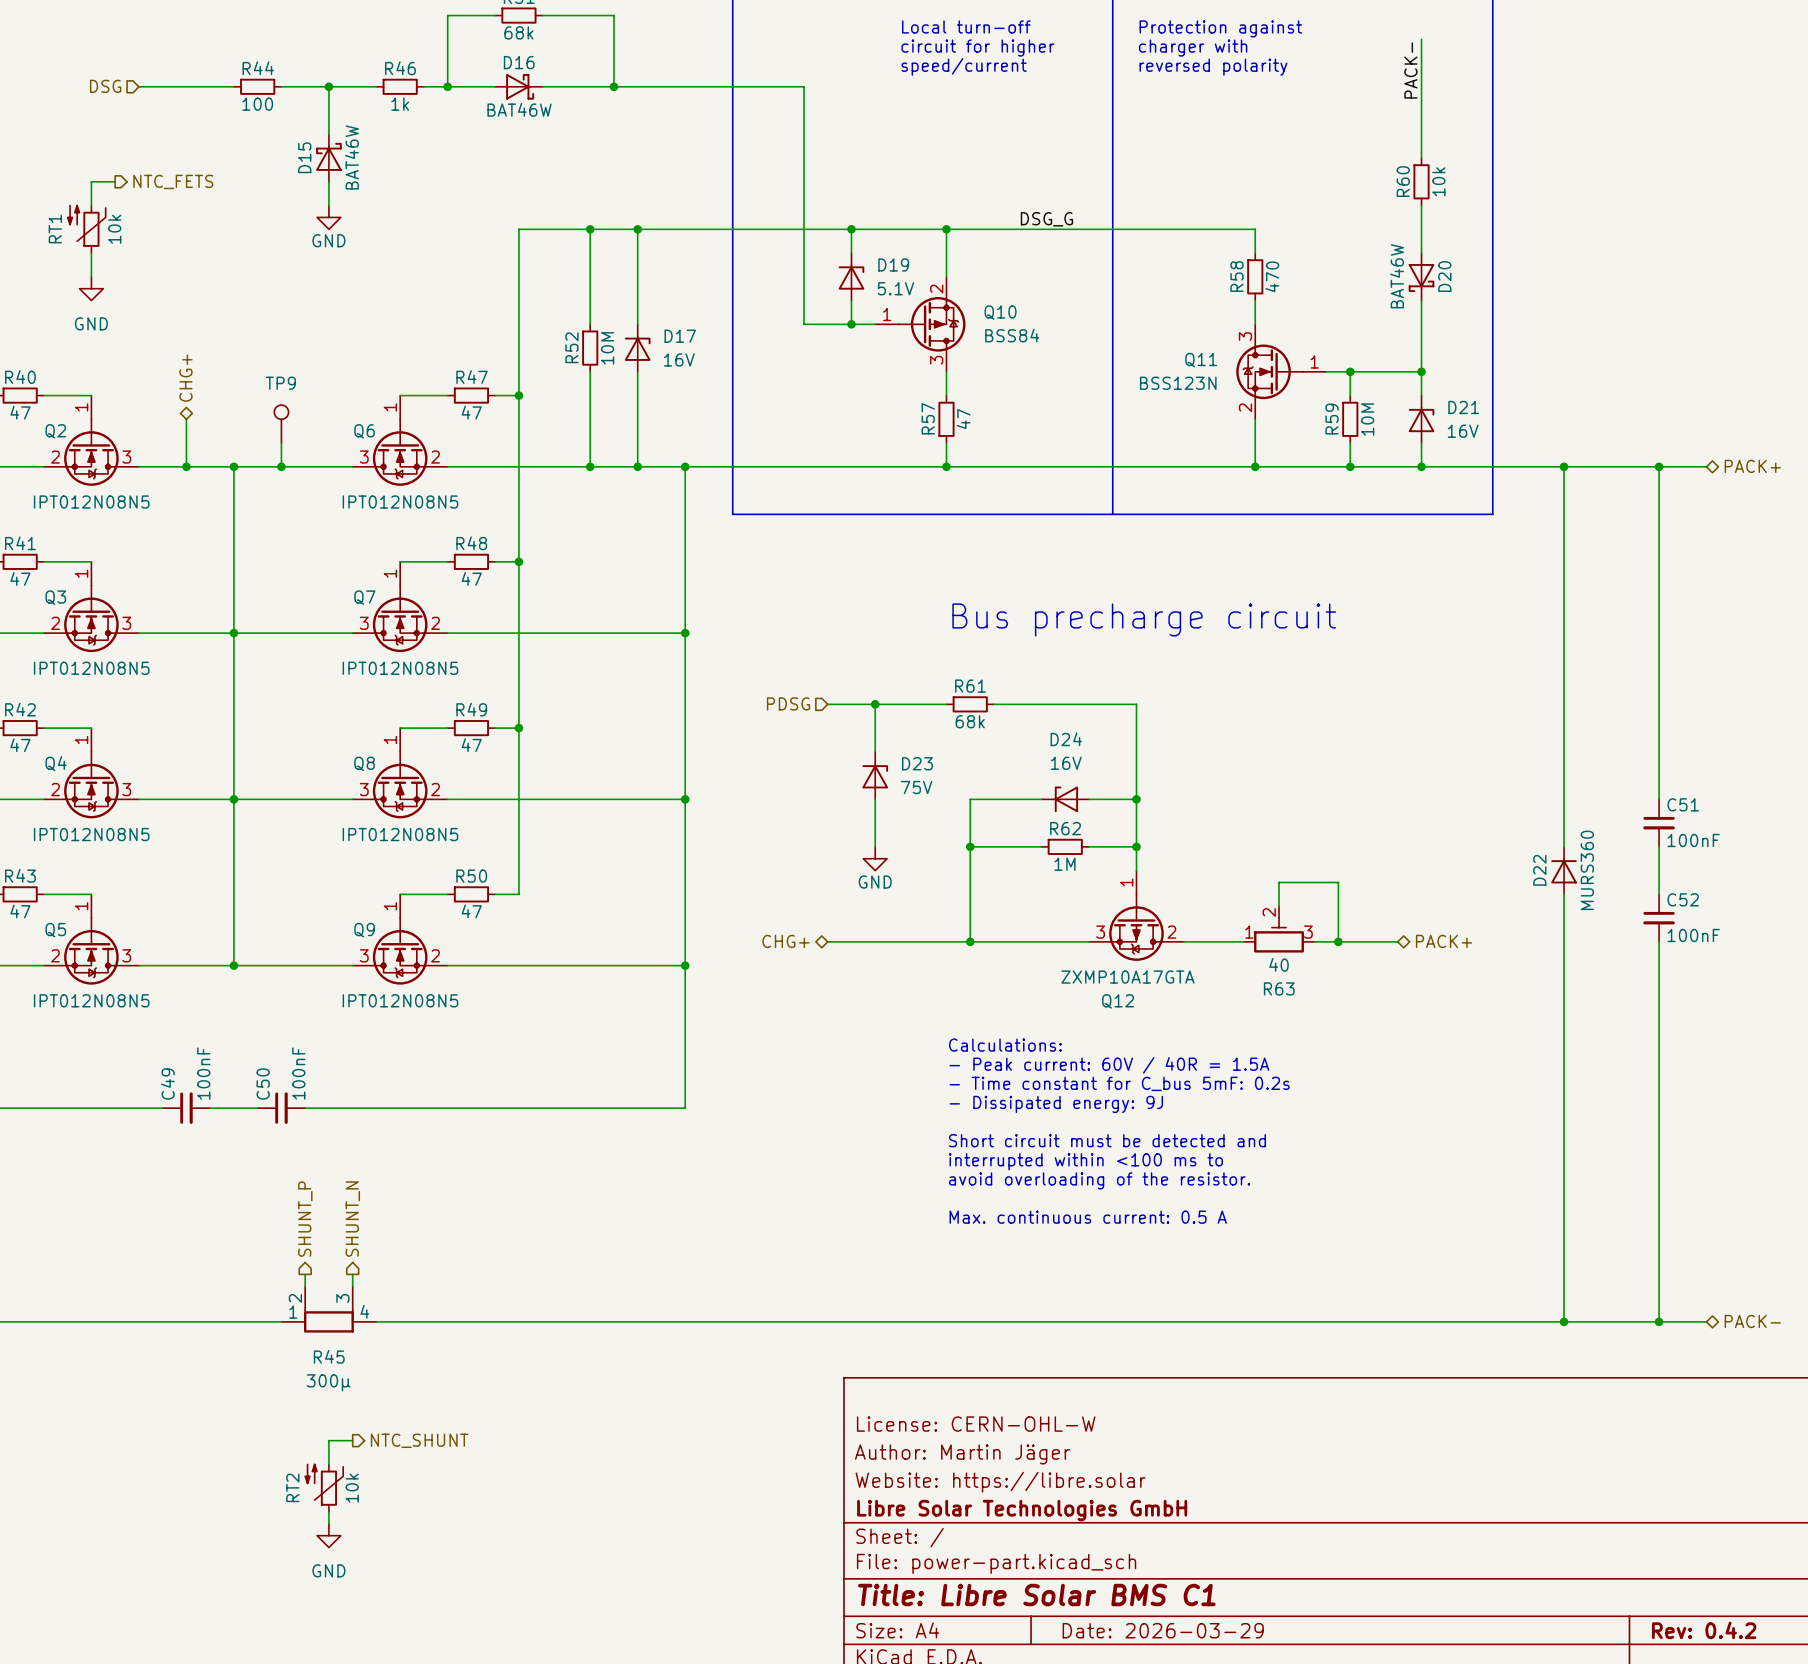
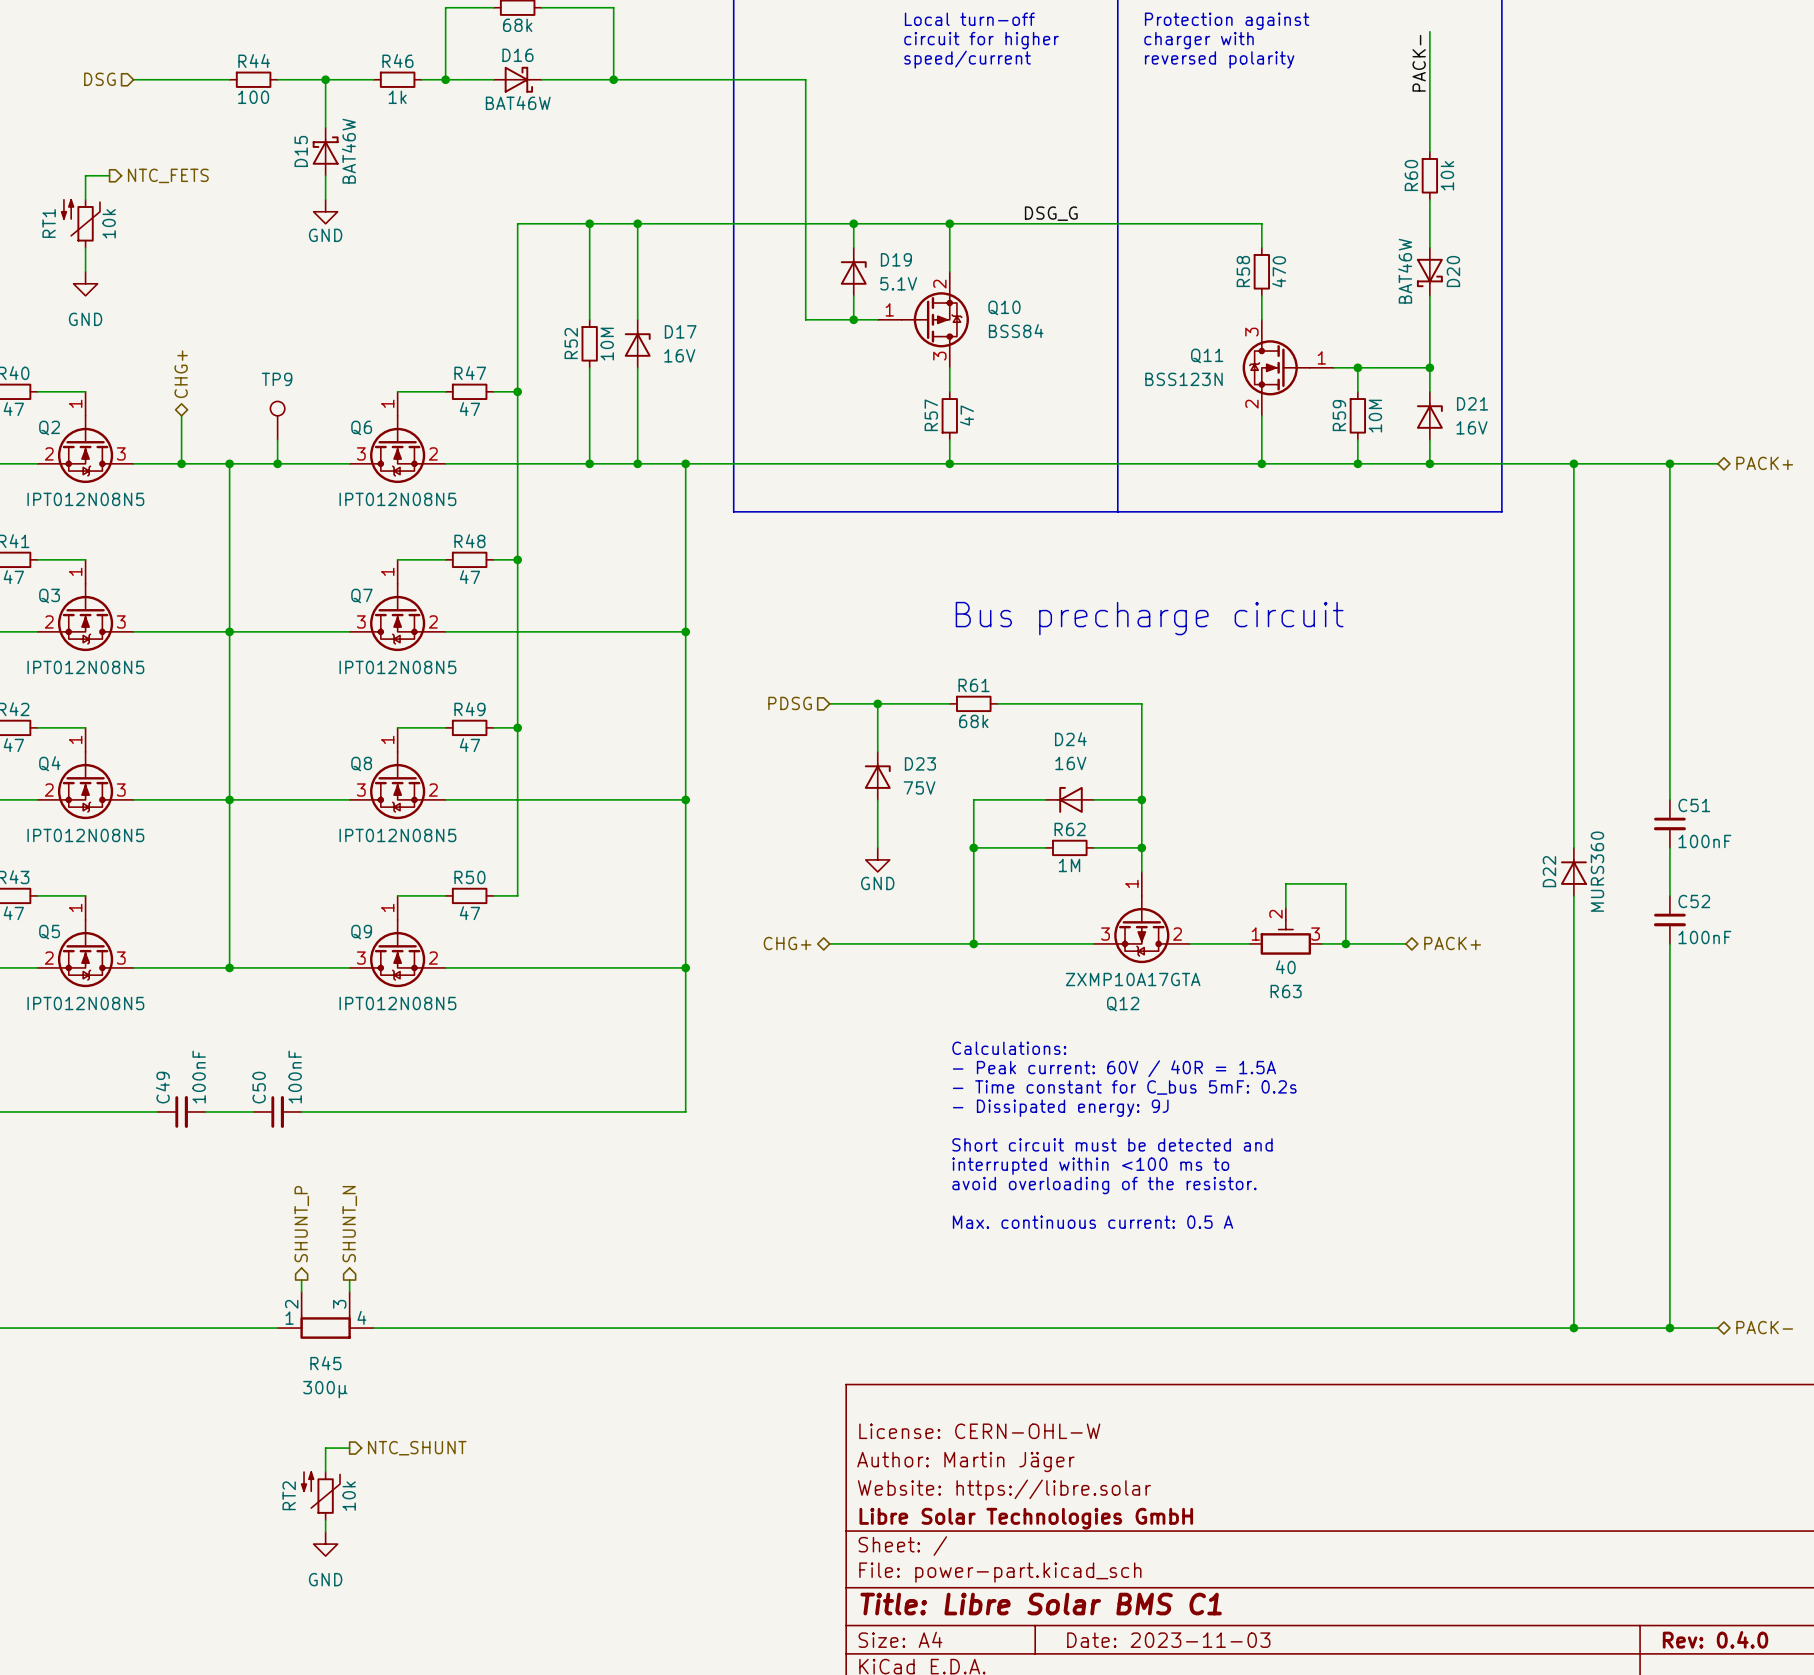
title block: Date: 2026-03-29 (1163, 1630) -> Date: 2023-11-03 (1168, 1640)
title block: Rev: 0.4.2 (1704, 1630) -> Rev: 0.4.0 (1715, 1639)

